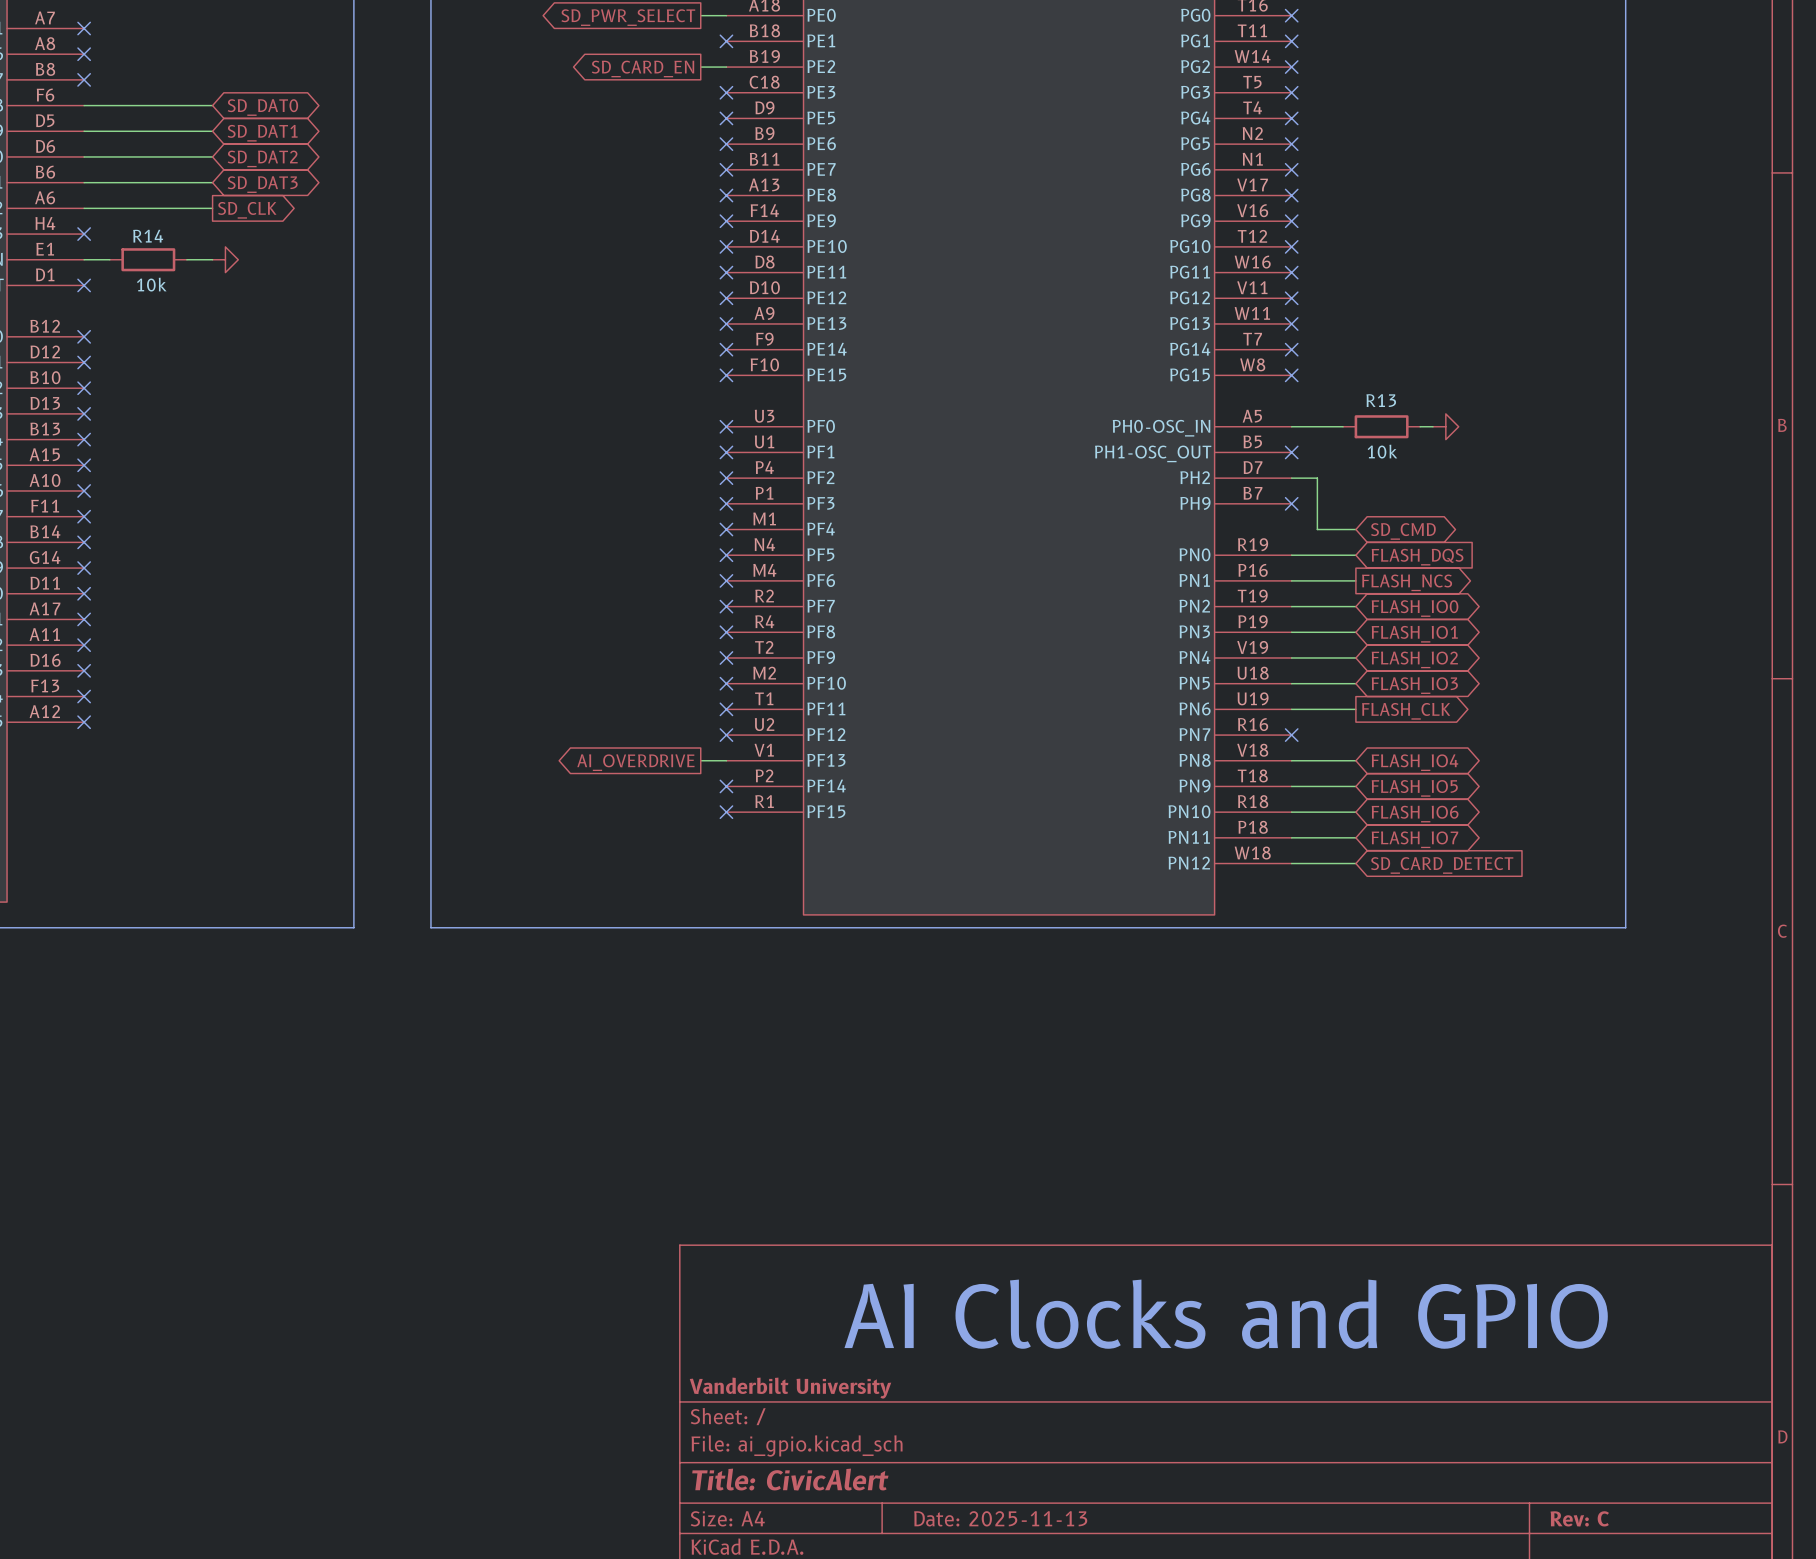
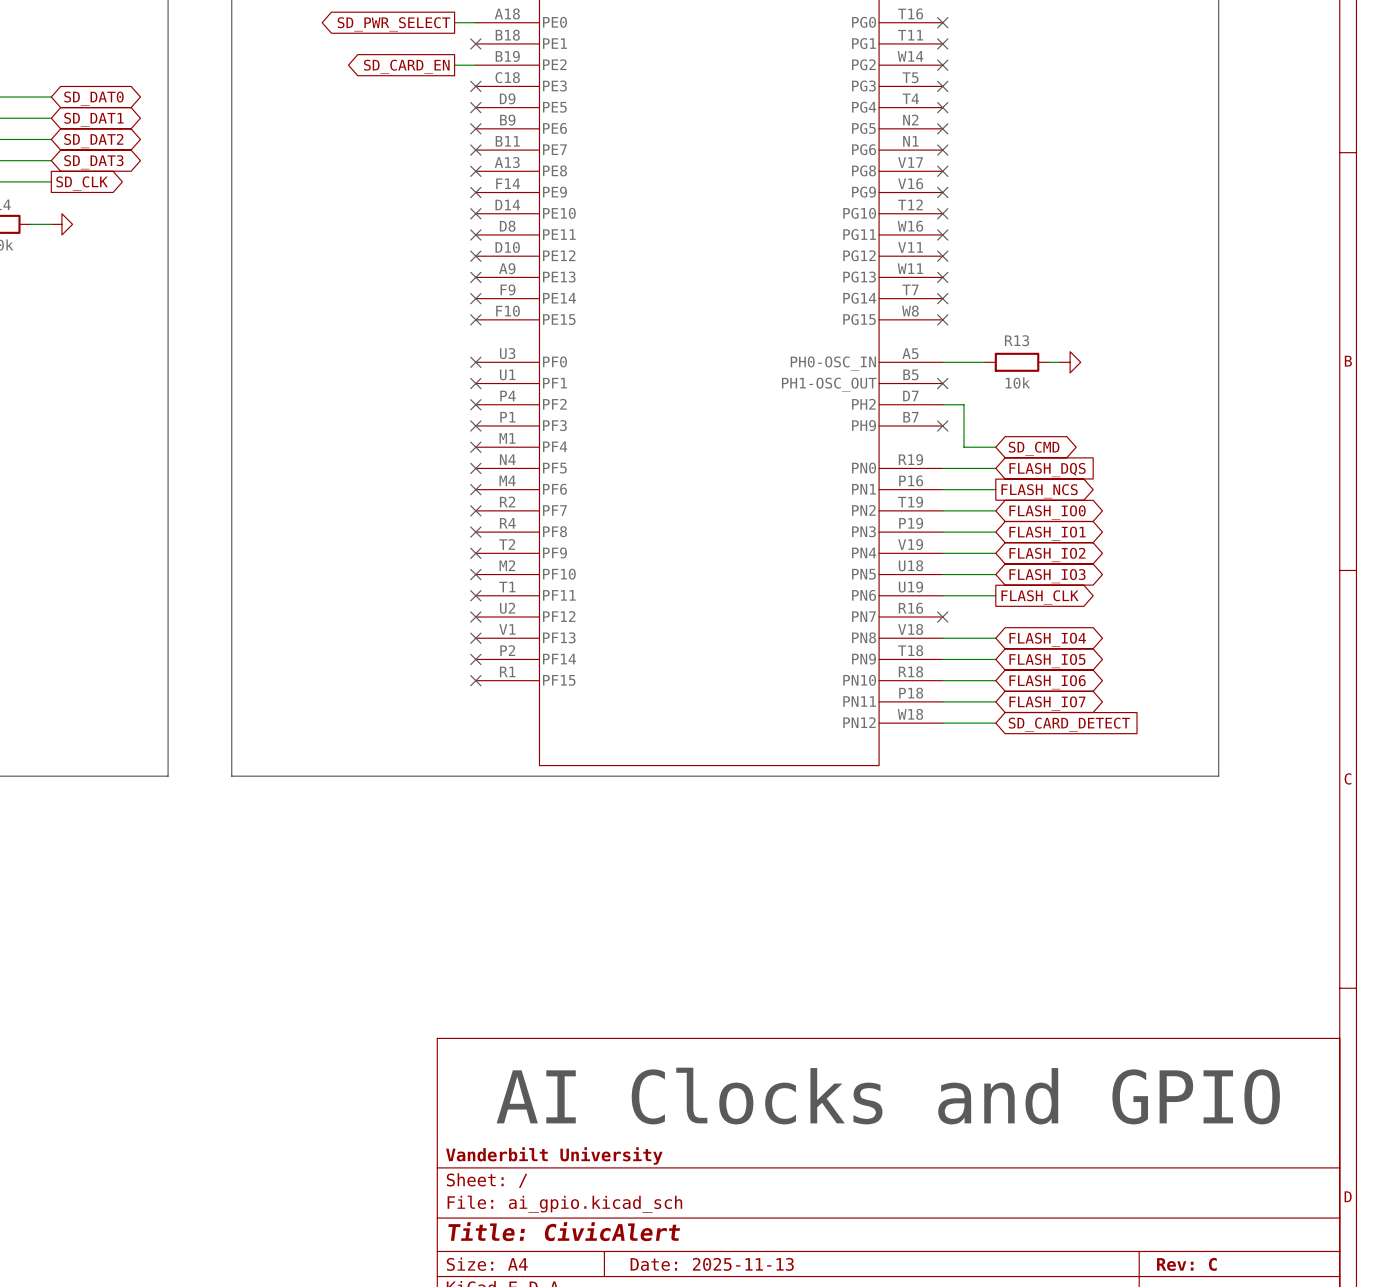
wire: (700, 760) (726, 760) -> none
no-connect mark: none -> (475, 638)
global label: AI_OVERDRIVE (635, 762) -> none

